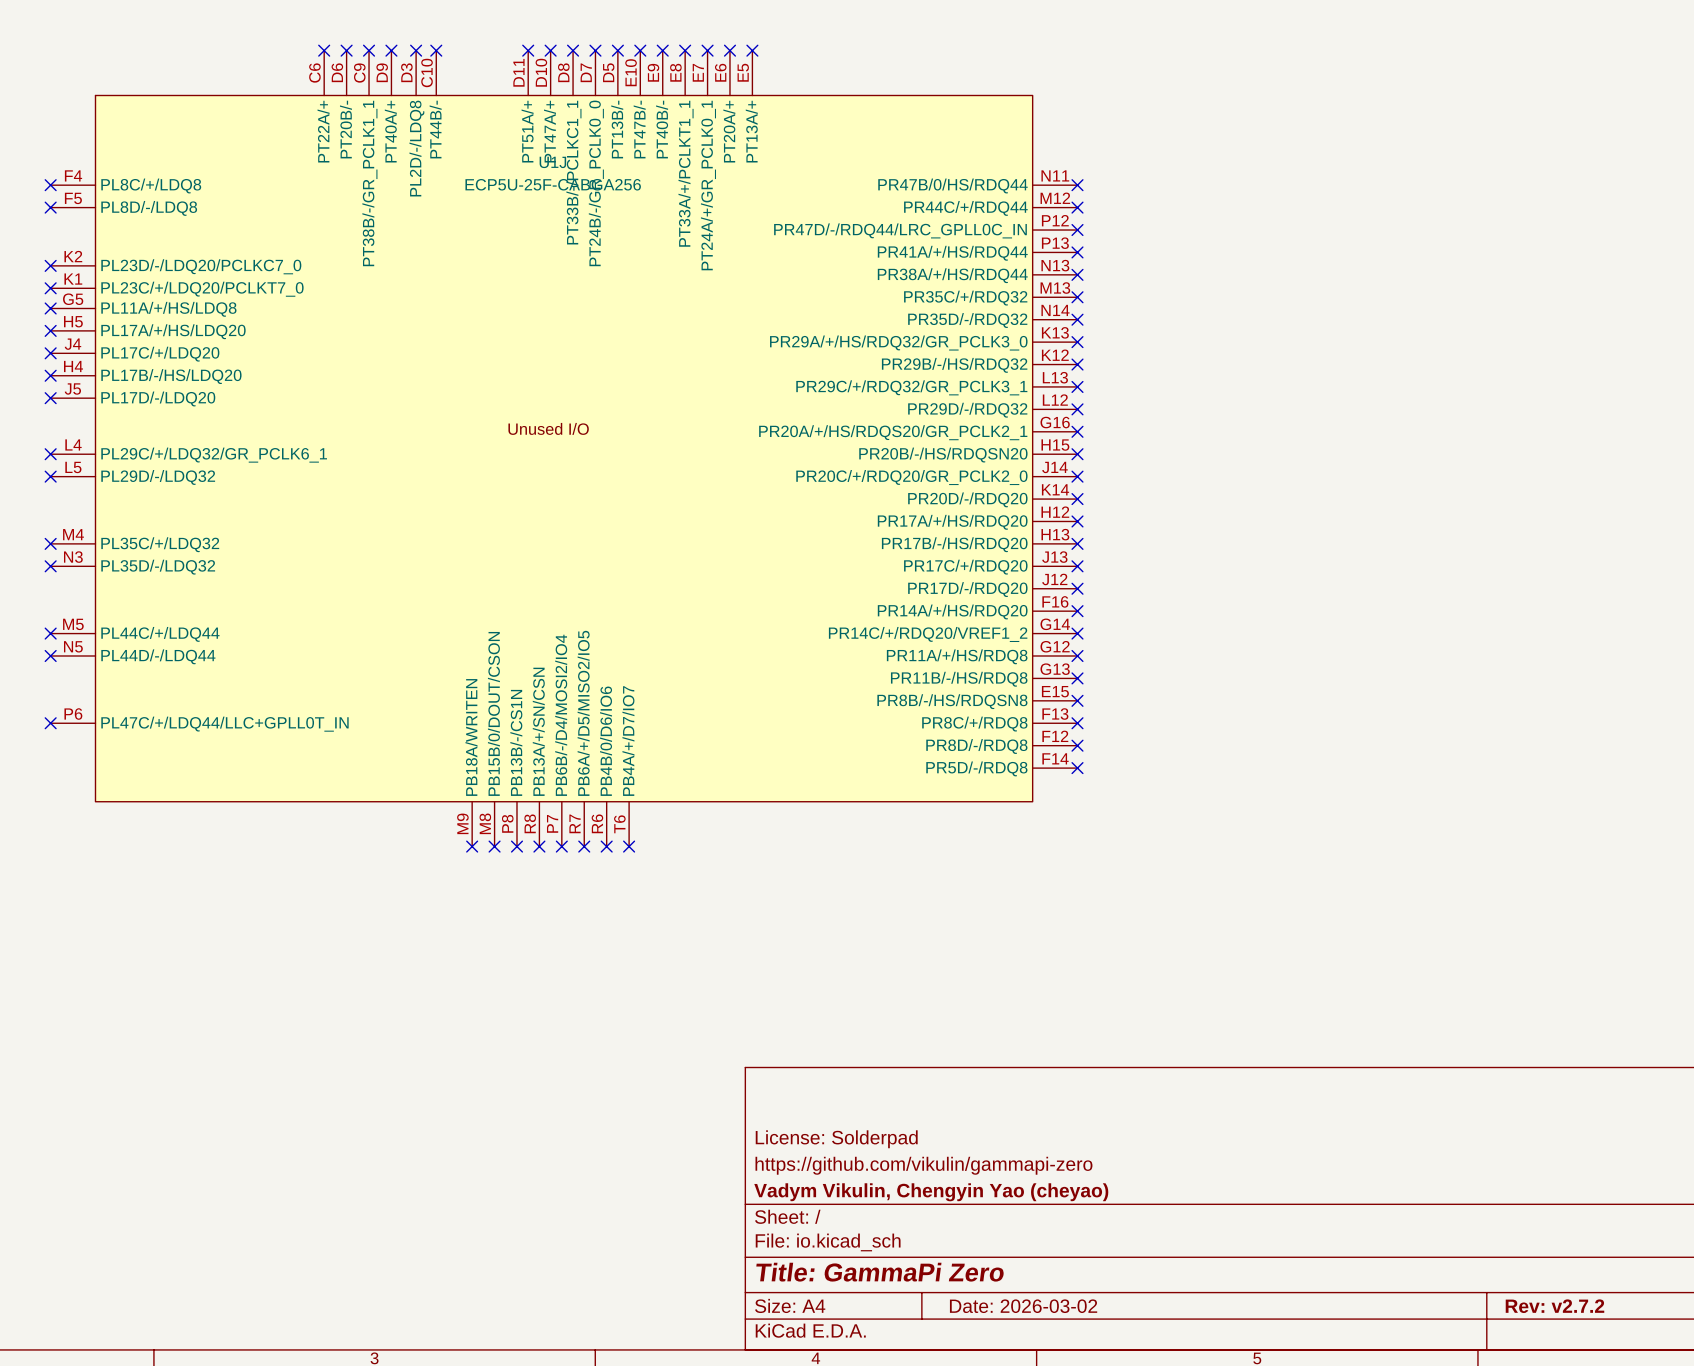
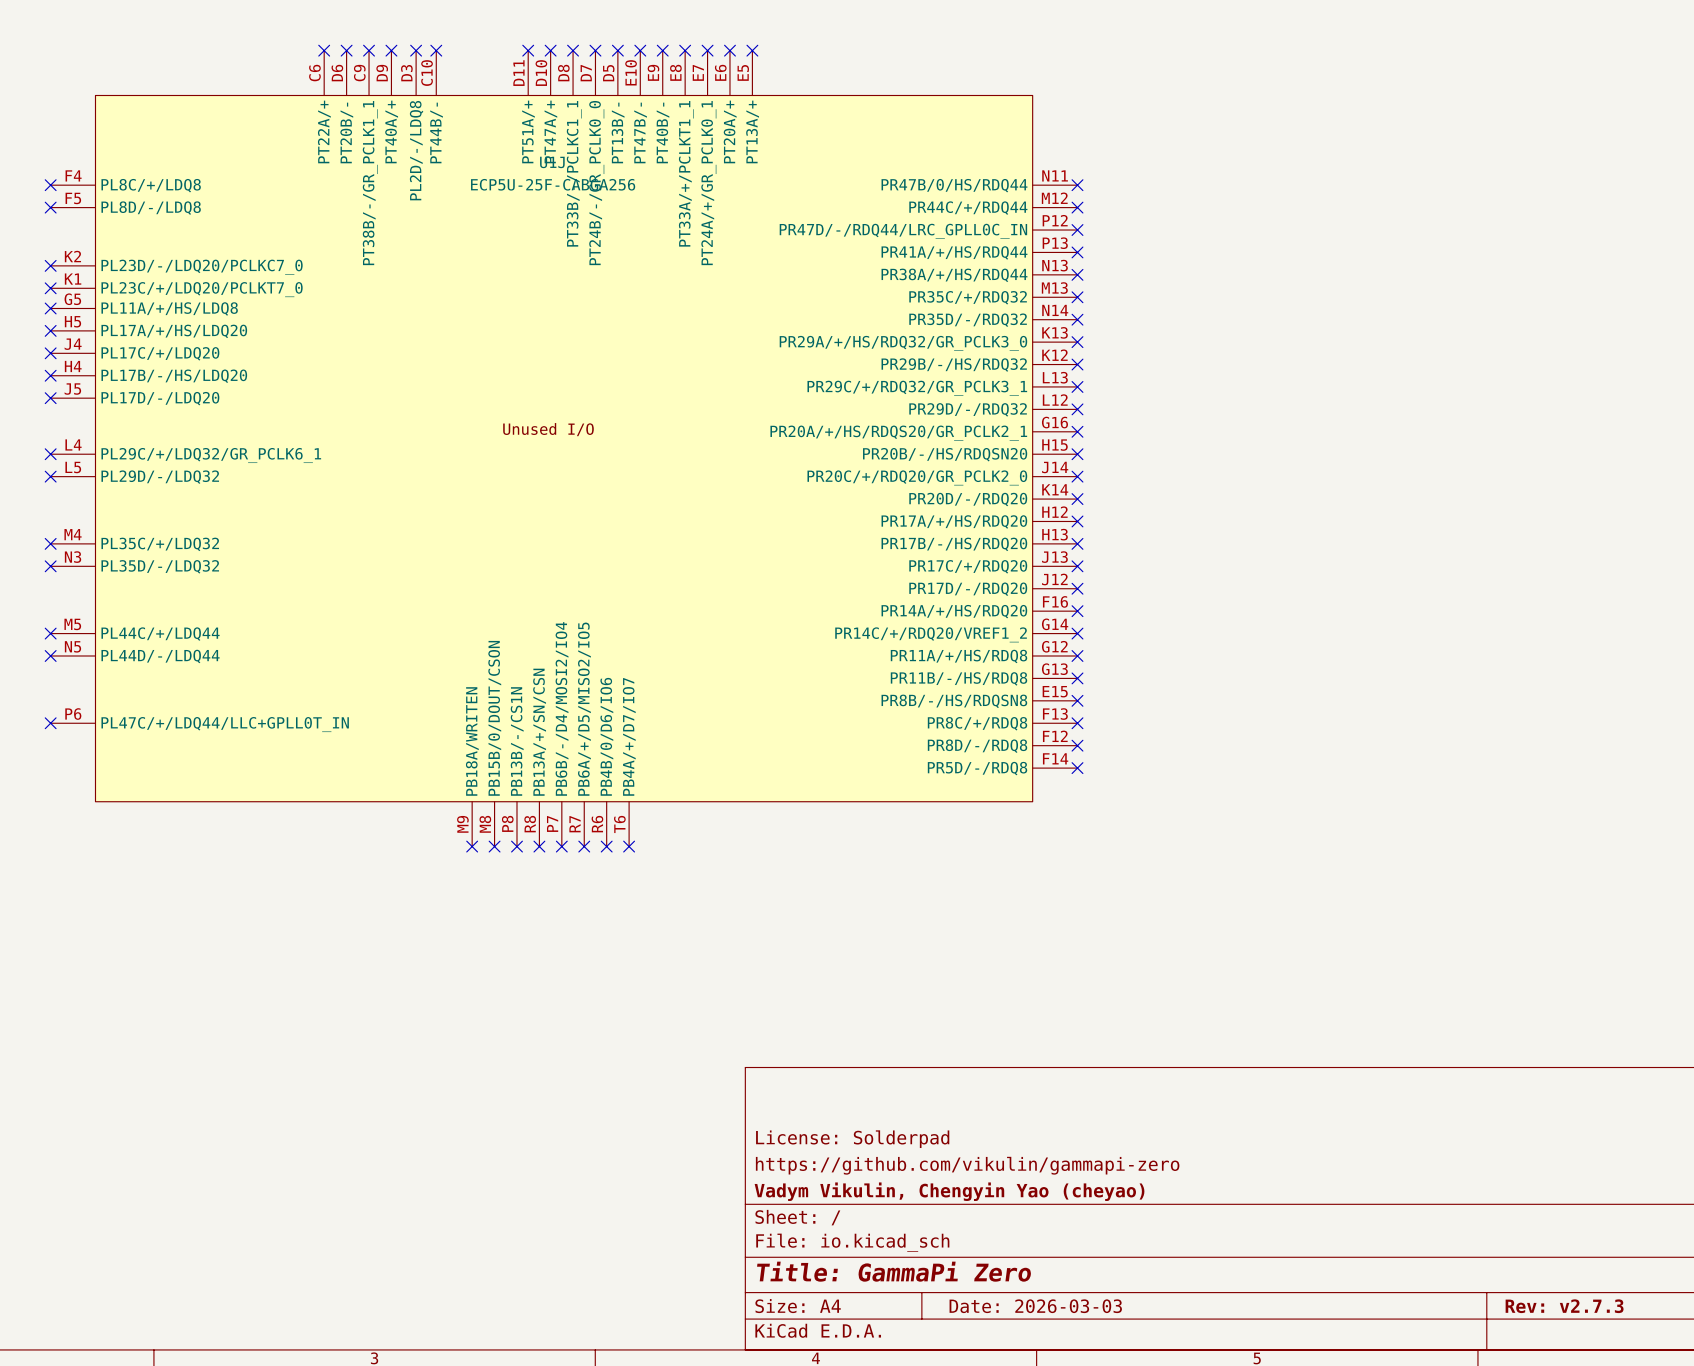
title block: Date: 2026-03-02 (1023, 1306) -> Date: 2026-03-03 (1035, 1306)
title block: Rev: v2.7.2 (1554, 1306) -> Rev: v2.7.3 (1564, 1306)

